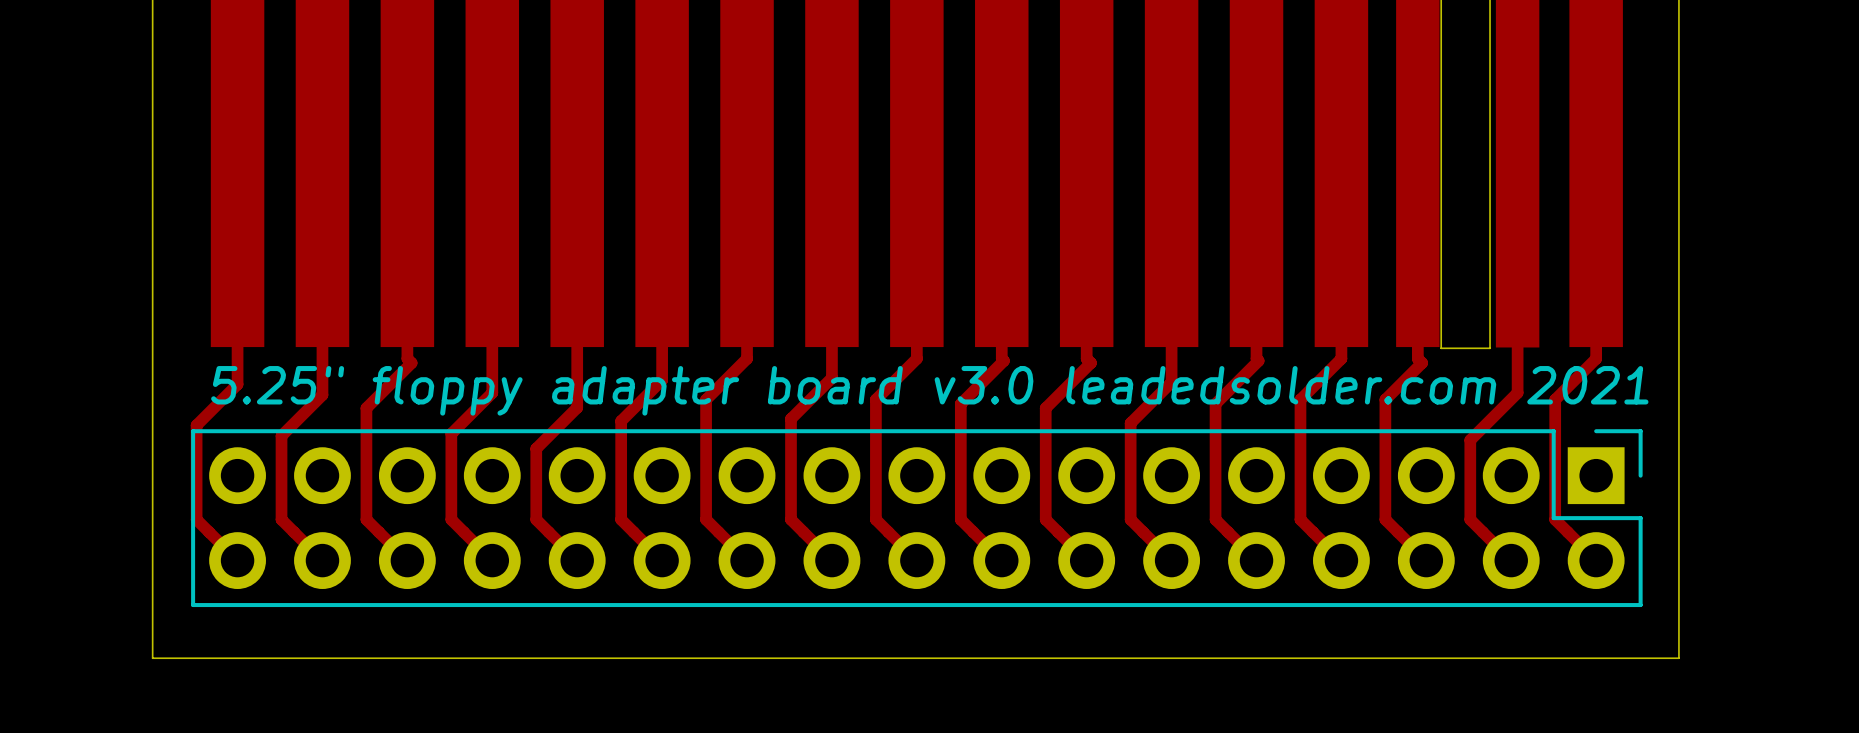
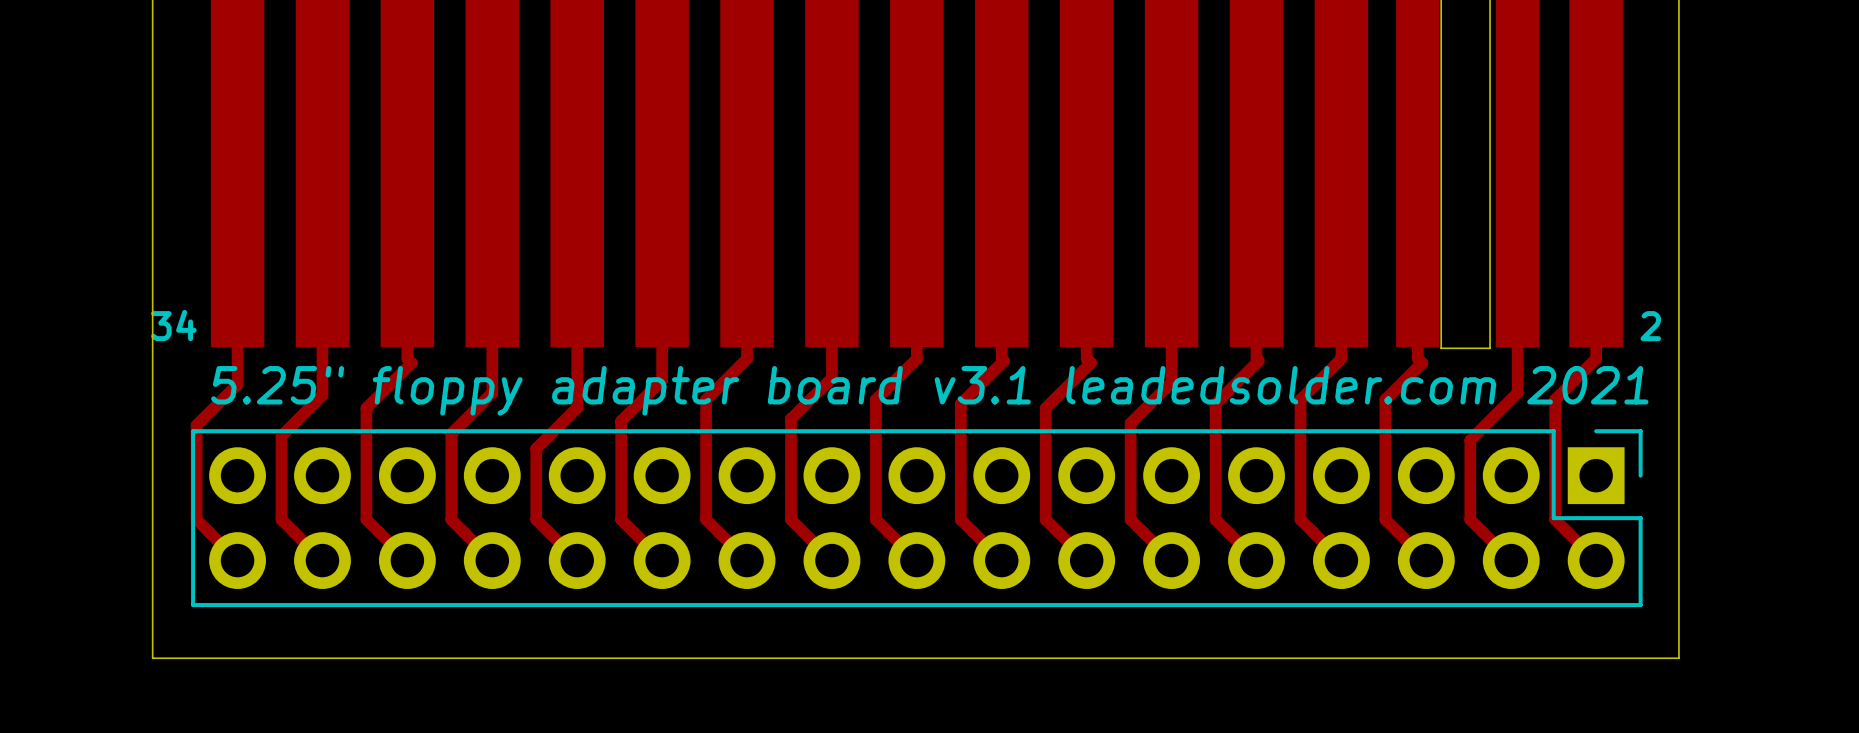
text: none -> 34 (173, 325)
text: none -> 2 (1650, 326)
text: 5.25" floppy adapter board v3.0 leadedsolder.com 2021 (929, 390) -> 5.25" floppy adapter board v3.1 leadedsolder.com 2021 (929, 390)

